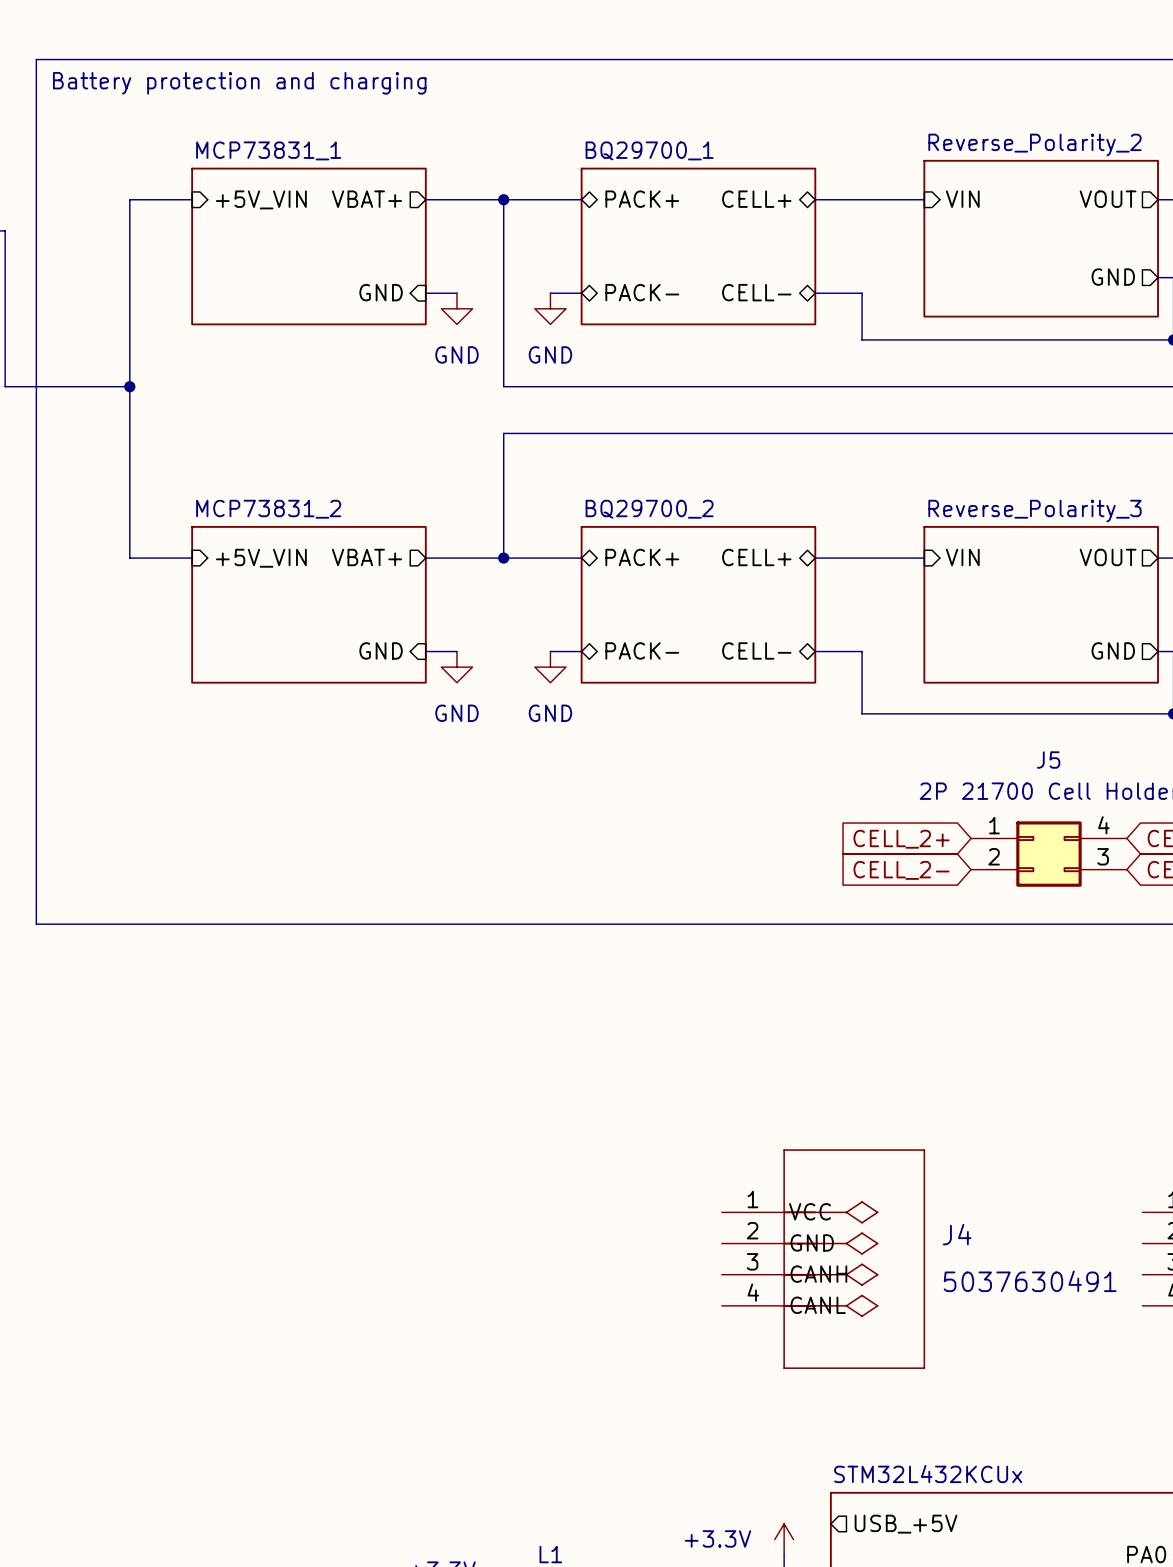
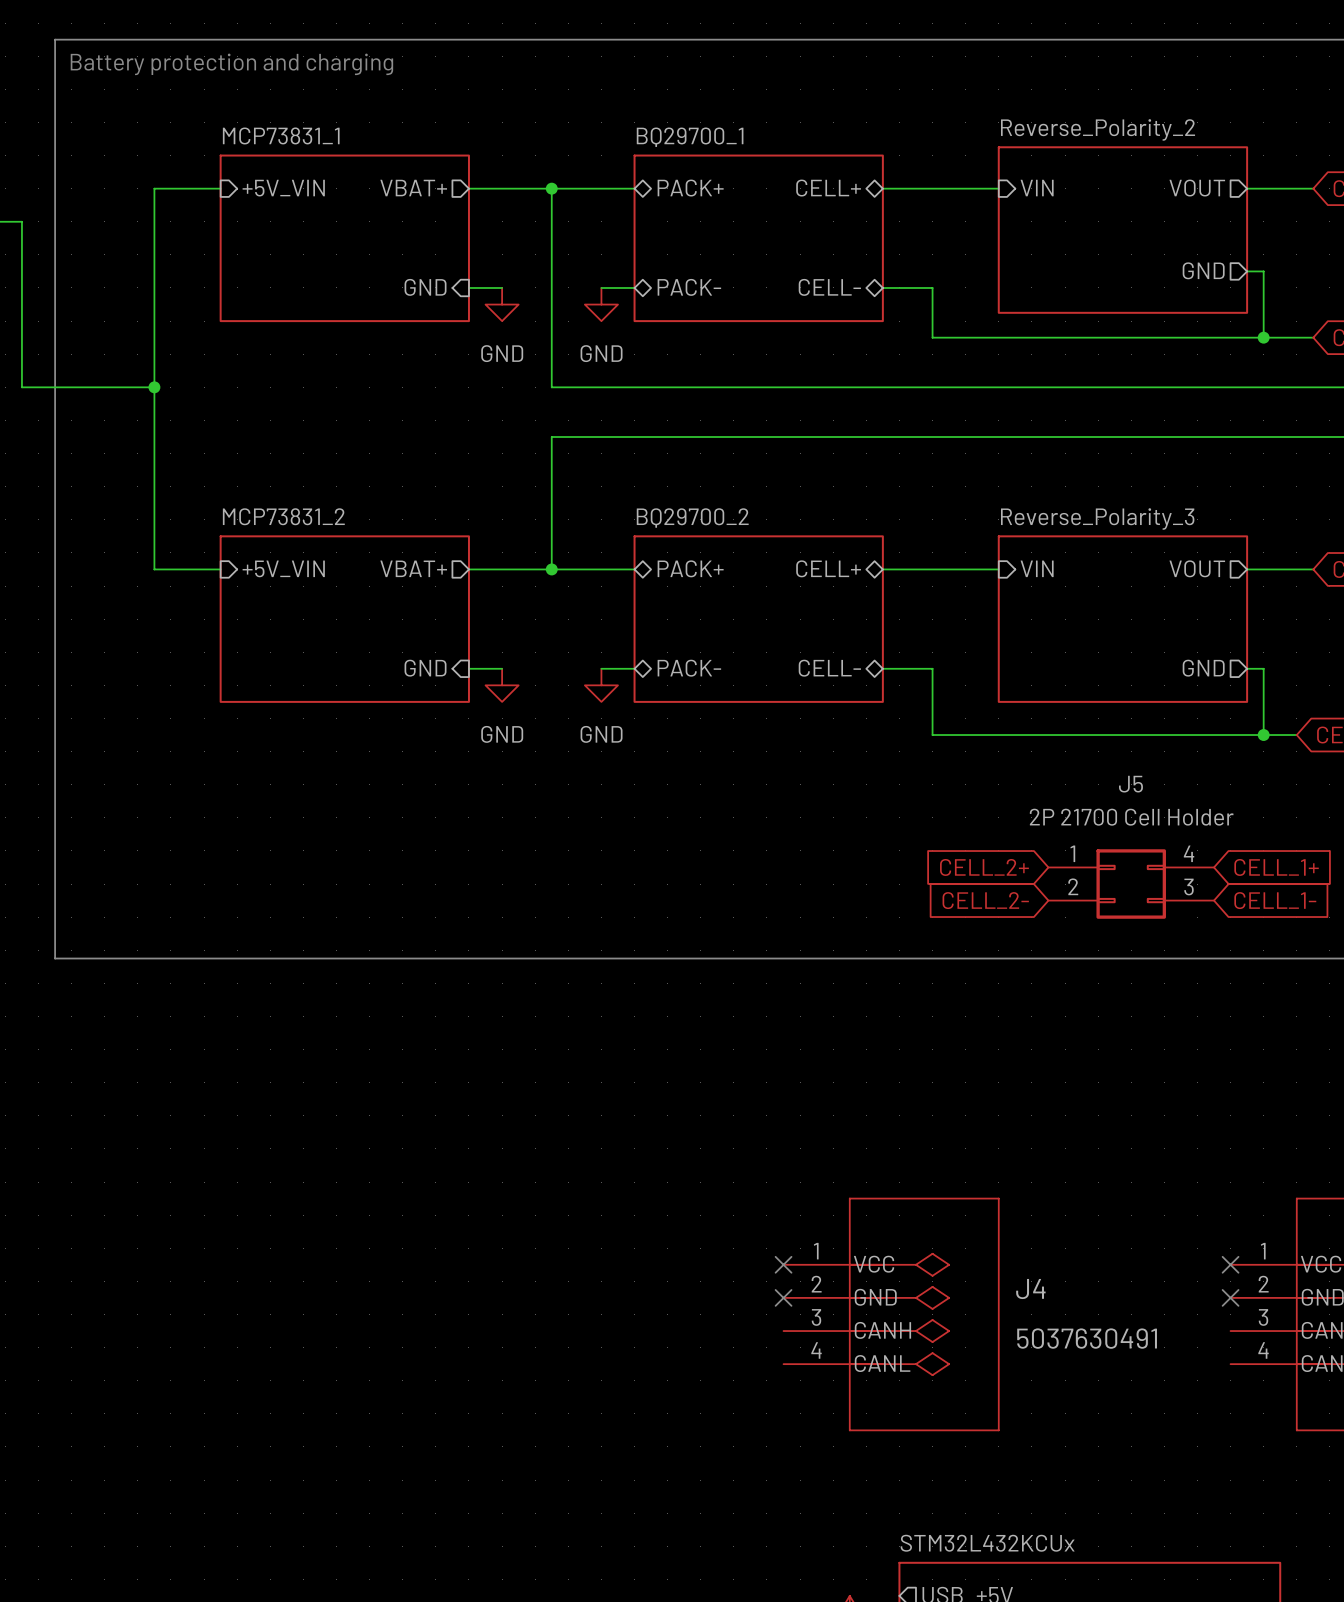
no-connect mark: none -> (783, 1264)
no-connect mark: none -> (1230, 1264)
no-connect mark: none -> (783, 1297)
no-connect mark: none -> (1230, 1297)

